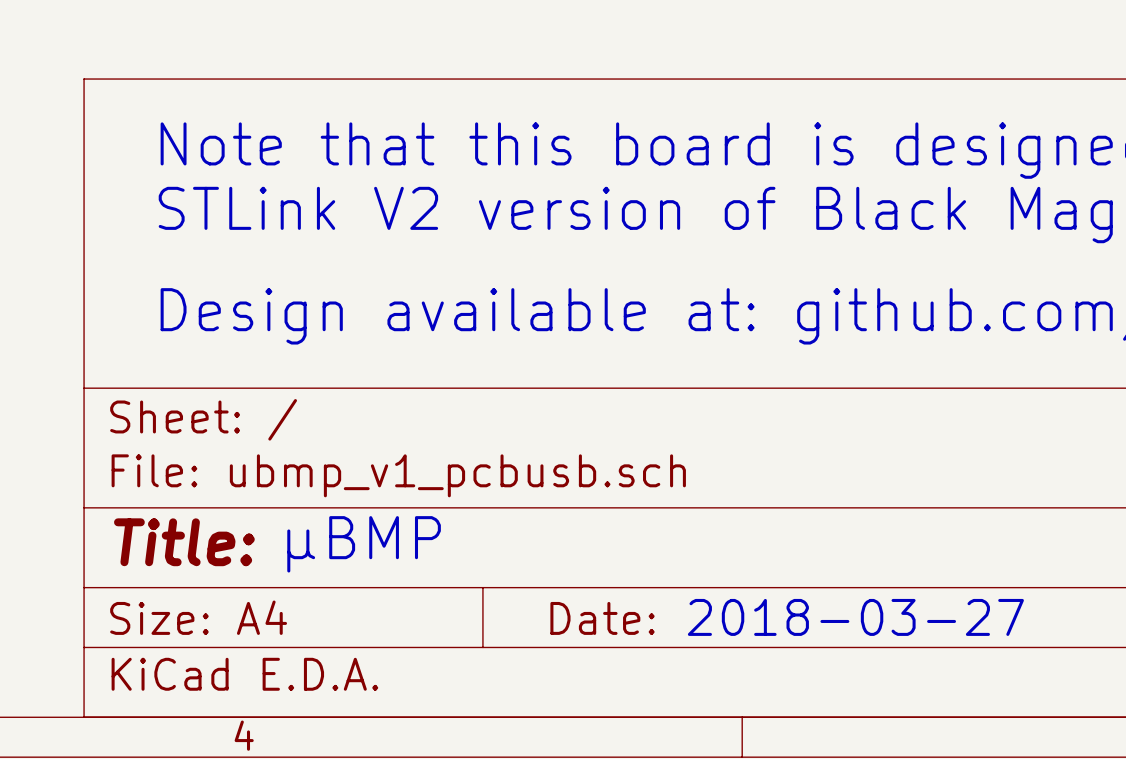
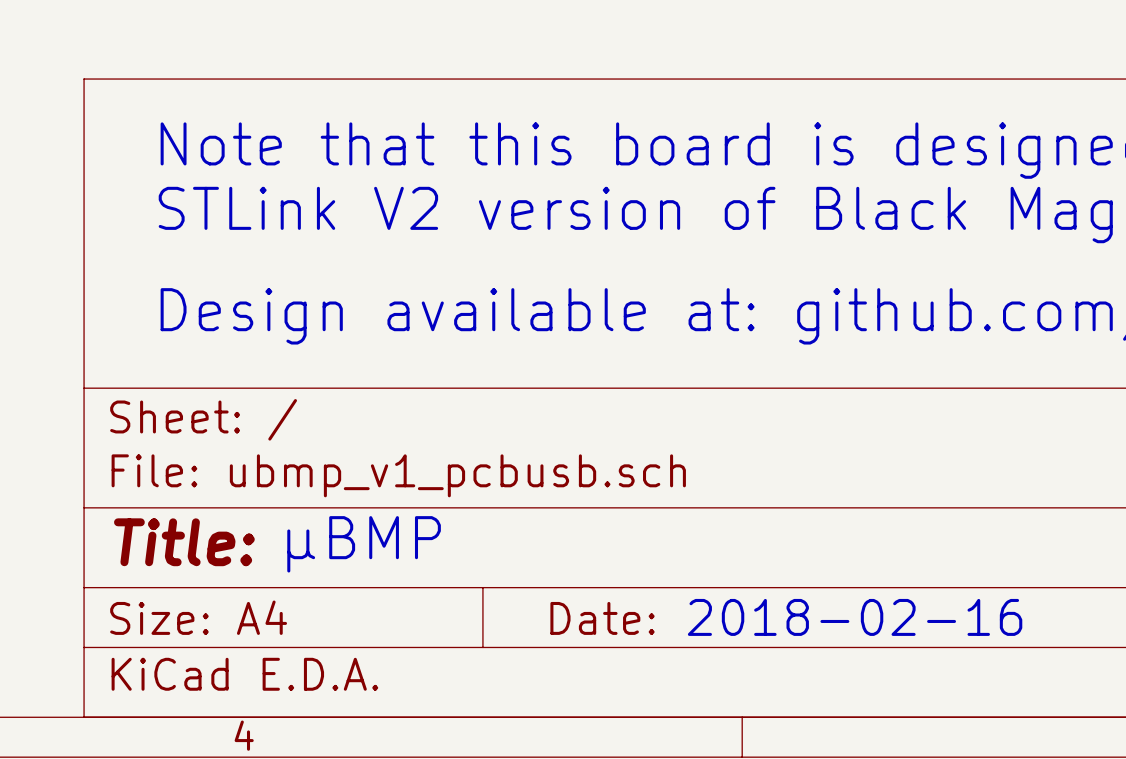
text: 2018-03-27 (855, 617) -> 2018-02-16 (855, 617)

